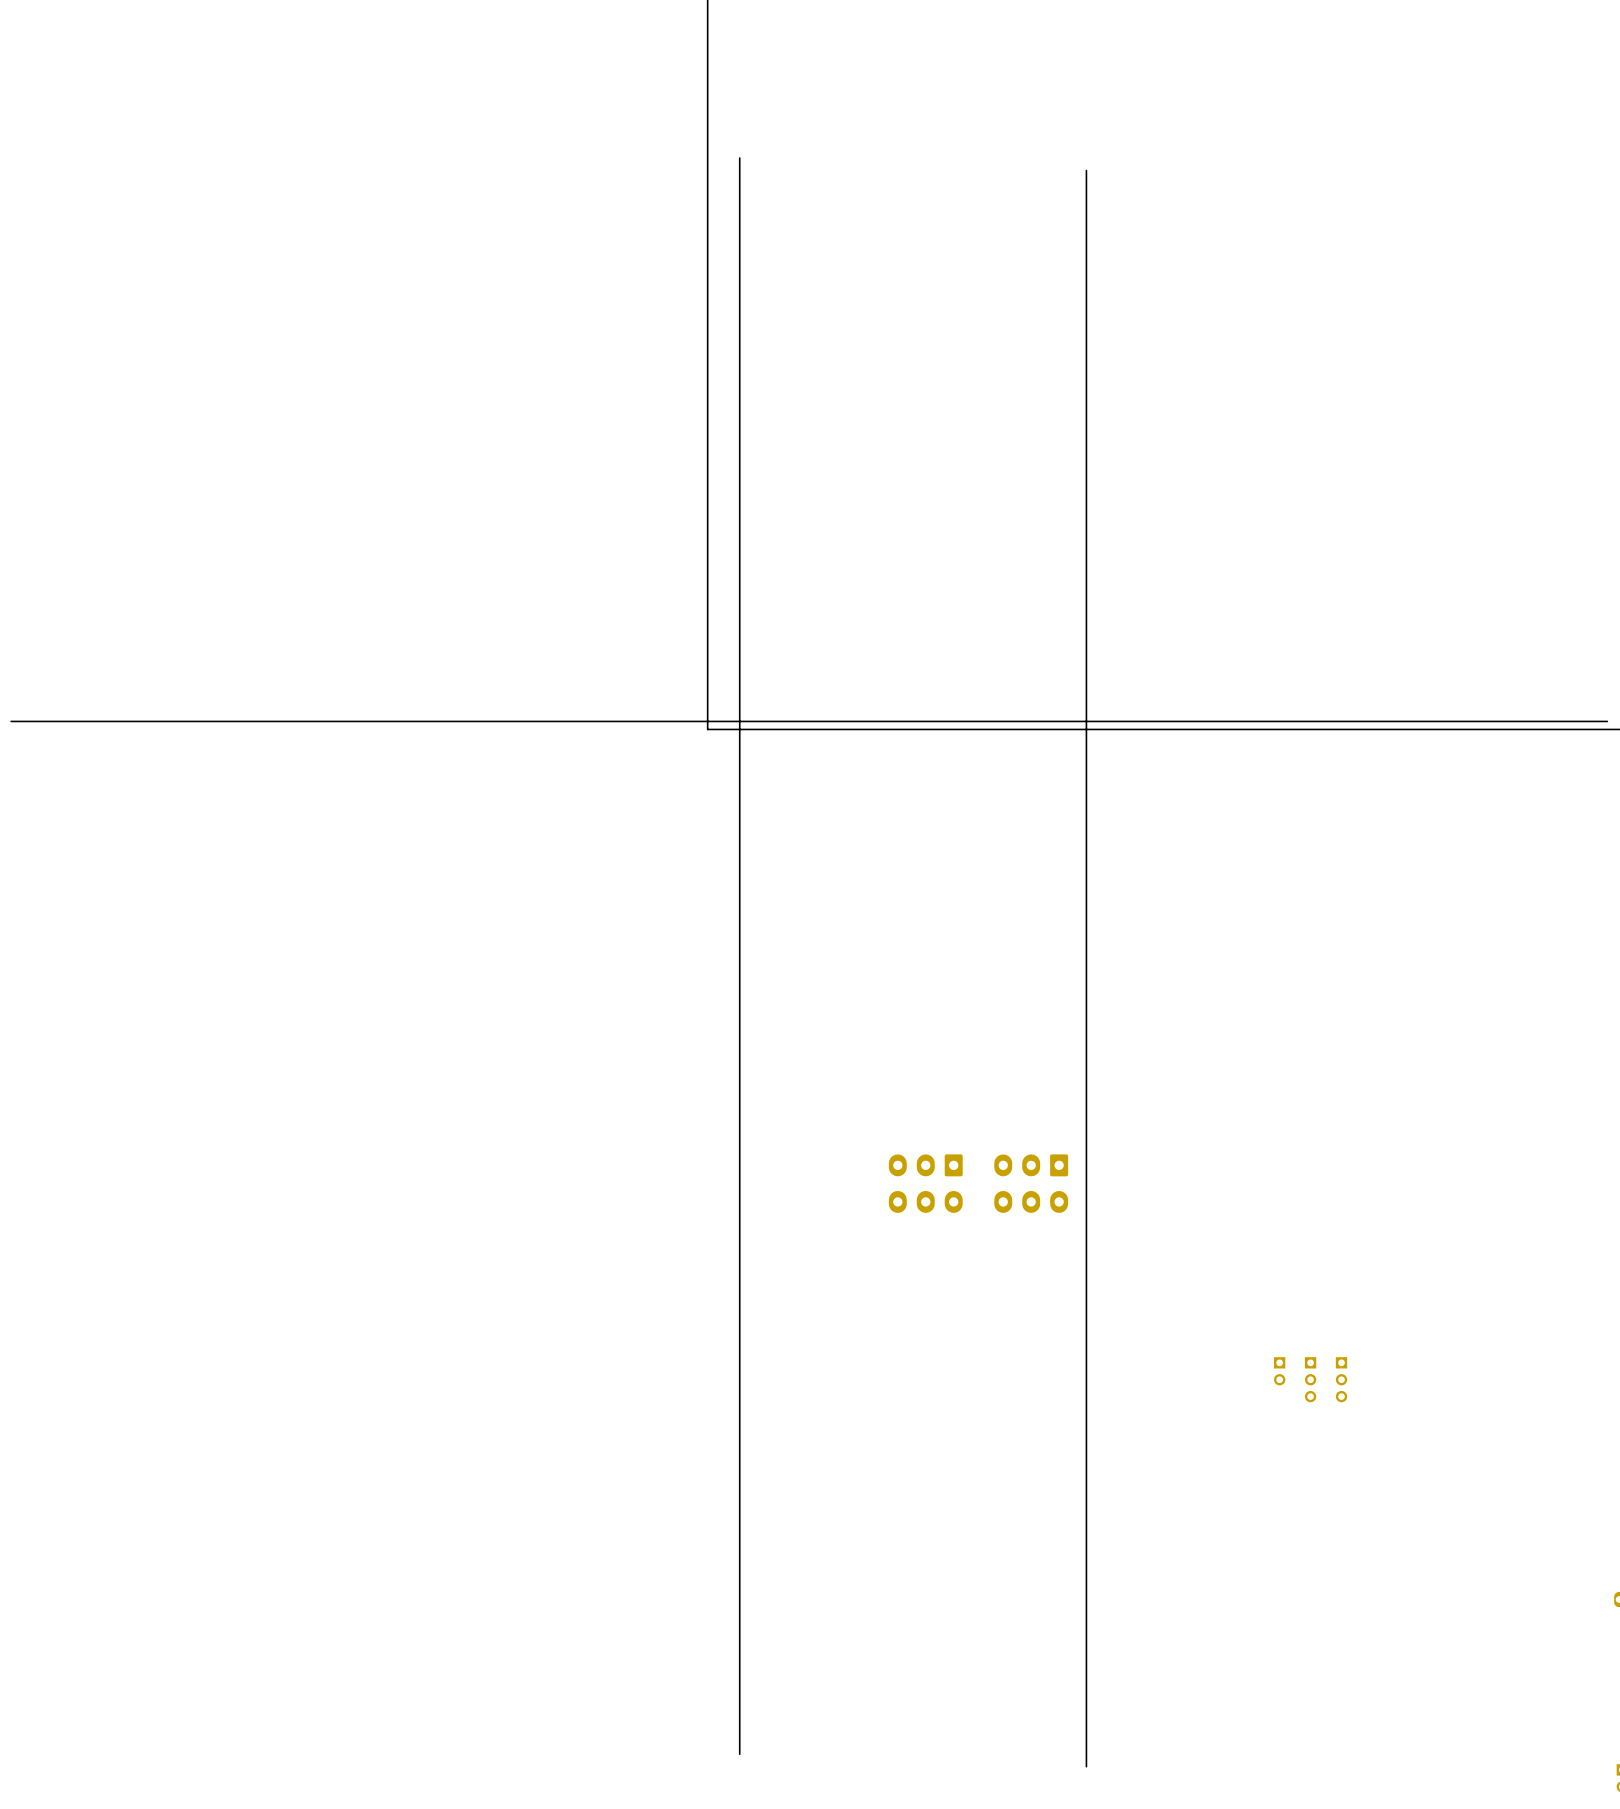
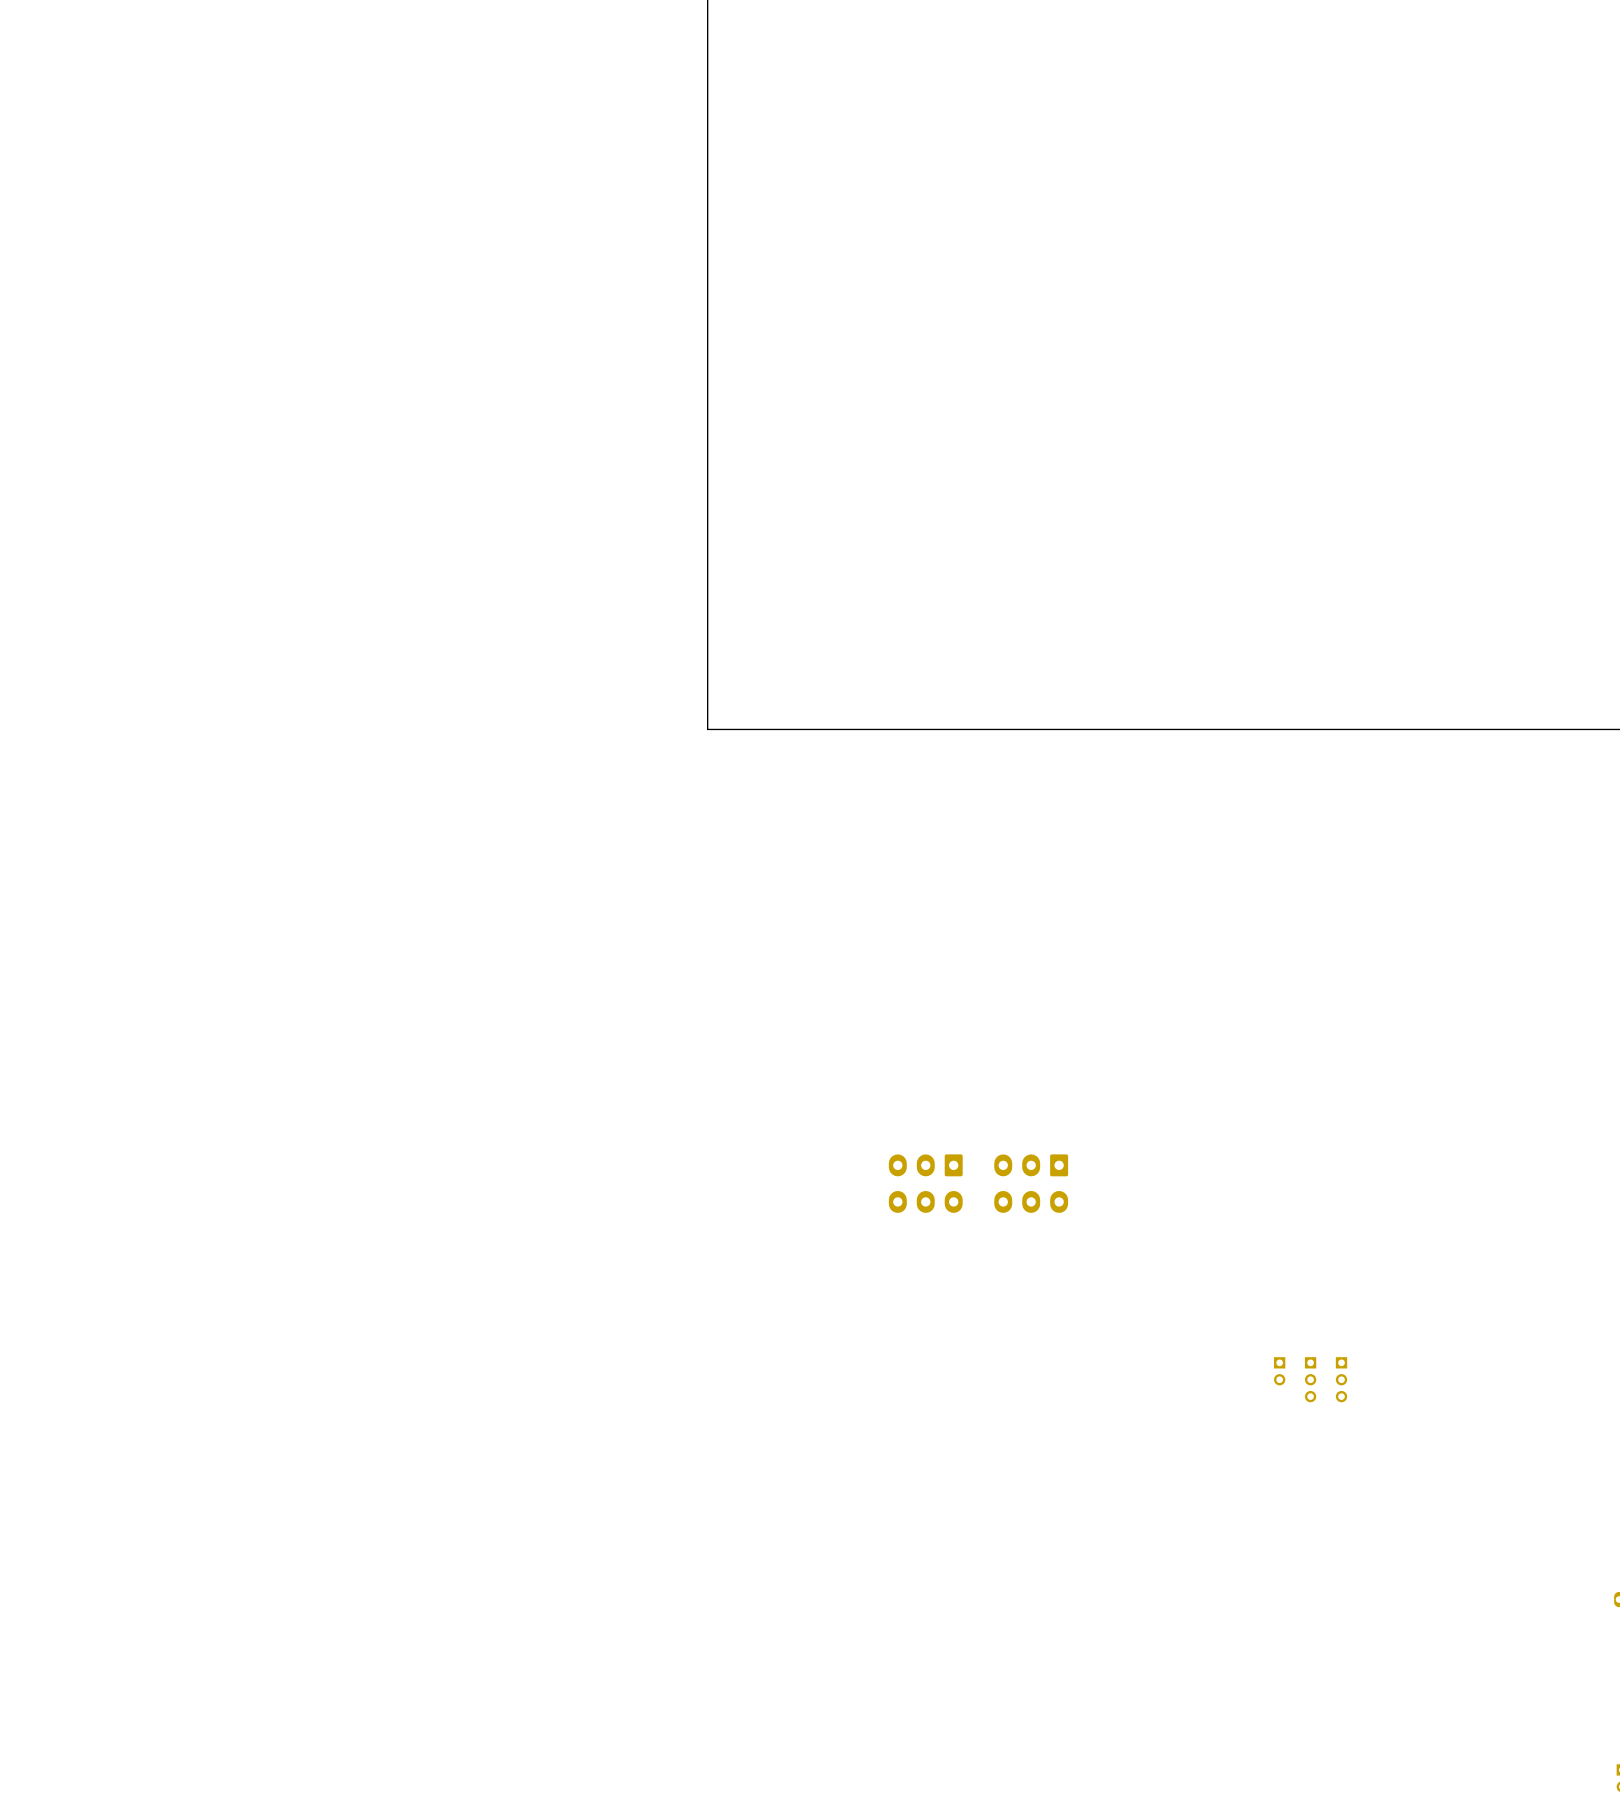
board edge: (739, 158) (739, 1754) -> none
board edge: (1086, 170) (1086, 1766) -> none
board edge: (1607, 721) (11, 721) -> none

